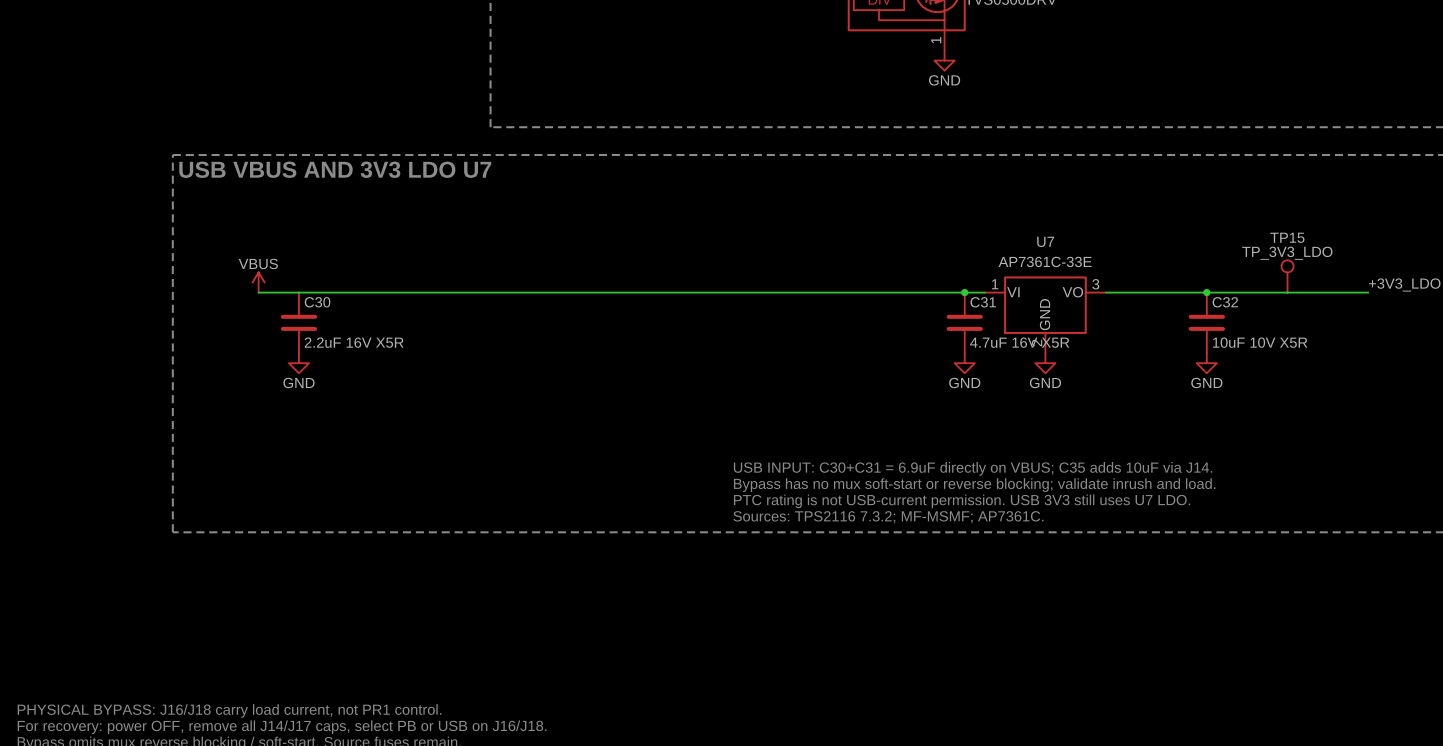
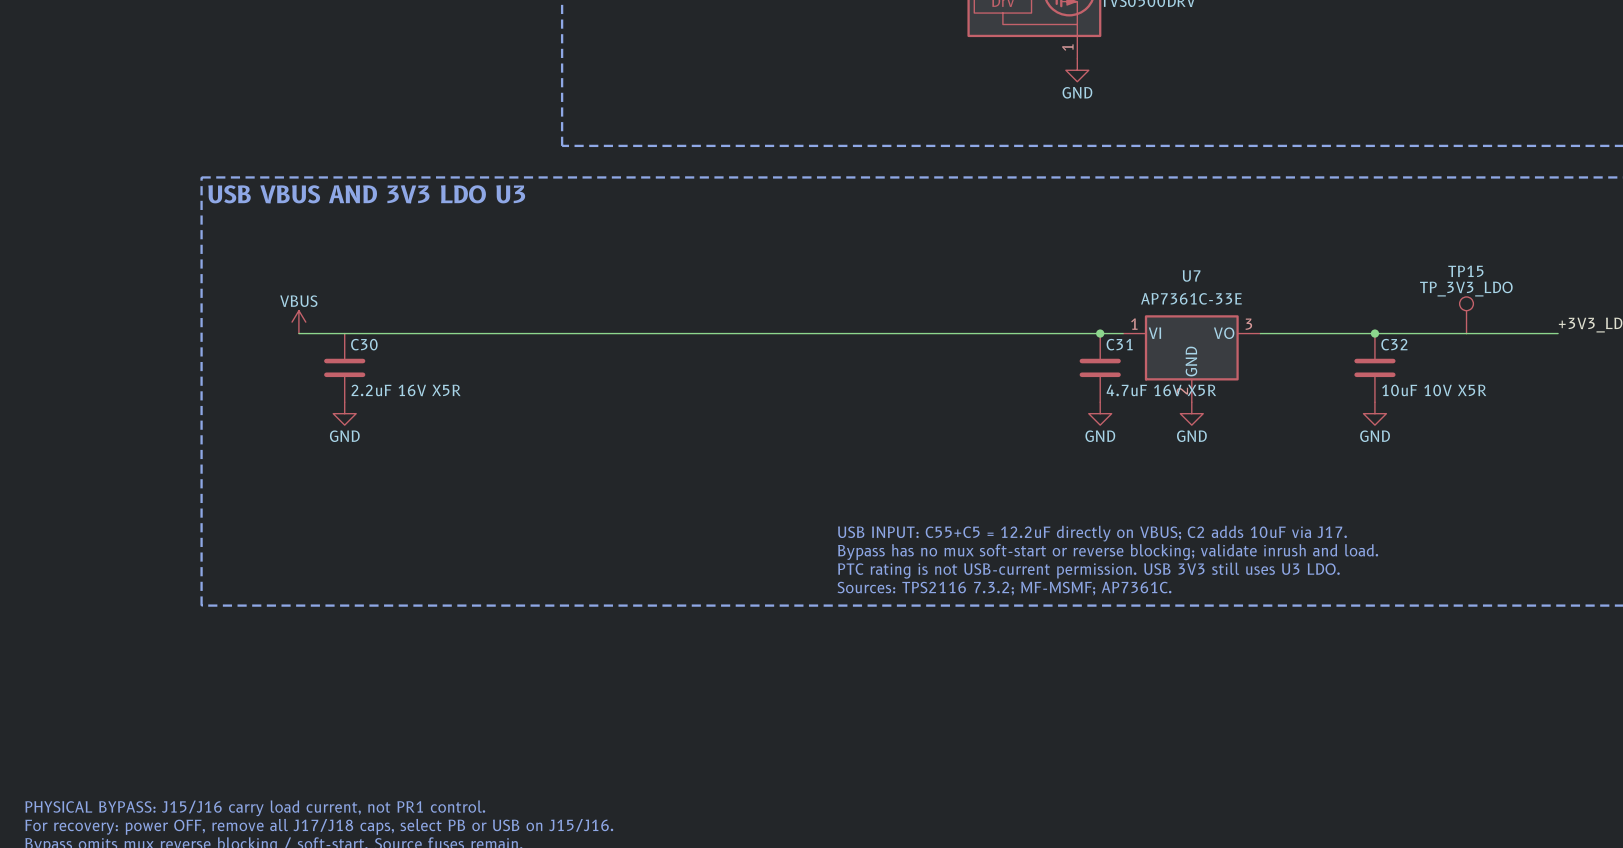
text: USB VBUS AND 3V3 LDO U7 (335, 169) -> USB VBUS AND 3V3 LDO U3 (366, 194)
text: USB INPUT: C30+C31 = 6.9uF directly on VBUS; C35 adds 10uF via J14. (973, 468) -> USB INPUT: C55+C5 = 12.2uF directly on VBUS; C2 adds 10uF via J17. (1092, 533)
text: PTC rating is not USB-current permission. USB 3V3 still uses U7 LDO. (962, 501) -> PTC rating is not USB-current permission. USB 3V3 still uses U3 LDO. (1088, 570)
text: PHYSICAL BYPASS: J16/J18 carry load current, not PR1 control. (229, 710) -> PHYSICAL BYPASS: J15/J16 carry load current, not PR1 control. (255, 808)
text: For recovery: power OFF, remove all J14/J17 caps, select PB or USB on J16/J18. (282, 727) -> For recovery: power OFF, remove all J17/J18 caps, select PB or USB on J15/J16. (319, 826)

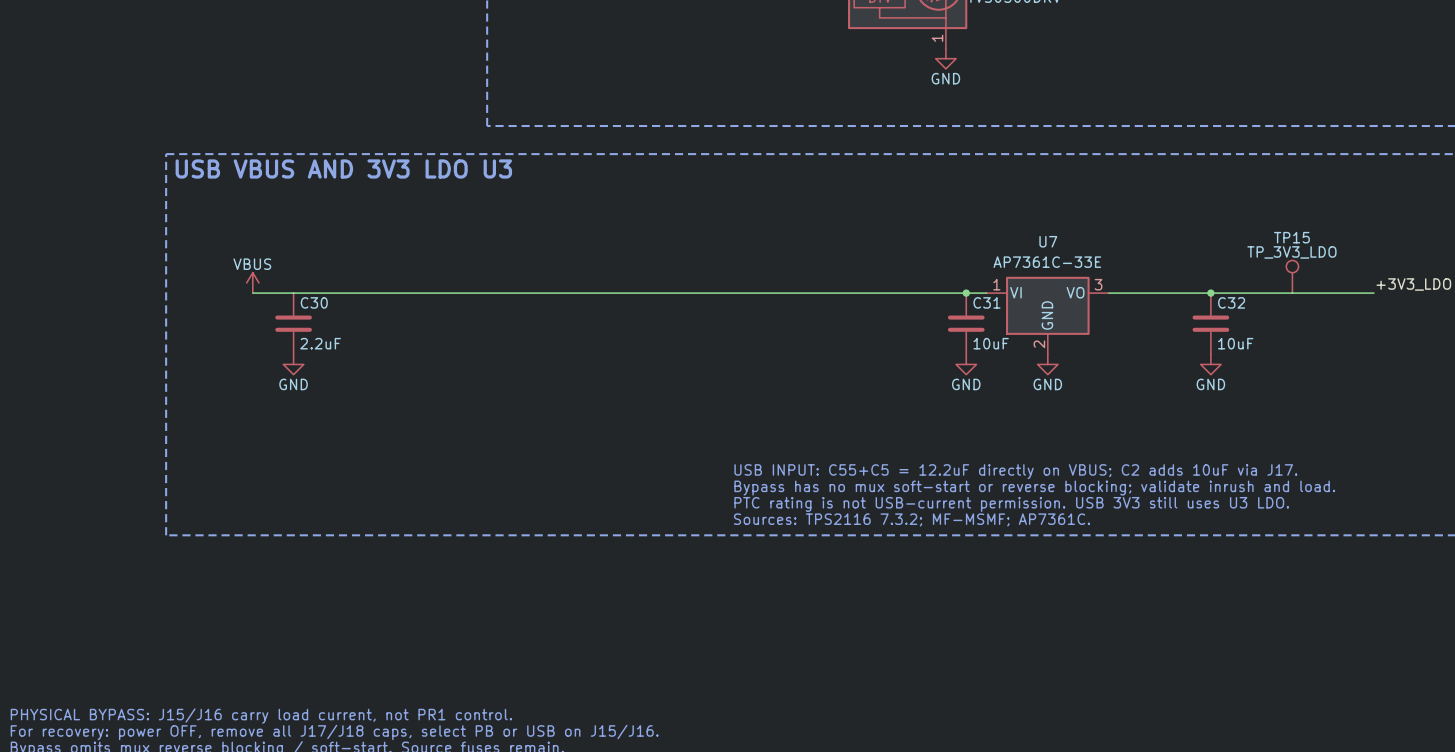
C30 value: 2.2uF 16V X5R (406, 390) -> 2.2uF (320, 343)
C31 value: 4.7uF 16V X5R (1161, 390) -> 10uF (991, 343)
C32 value: 10uF 10V X5R (1434, 390) -> 10uF (1235, 343)

